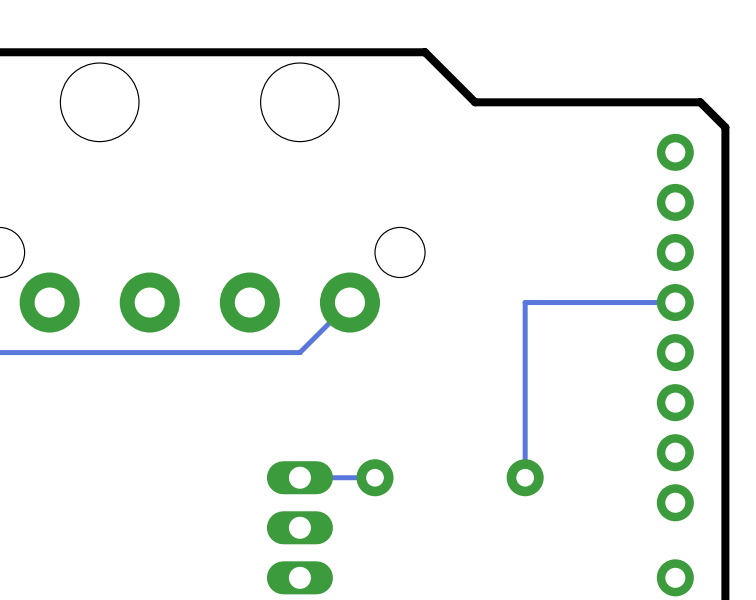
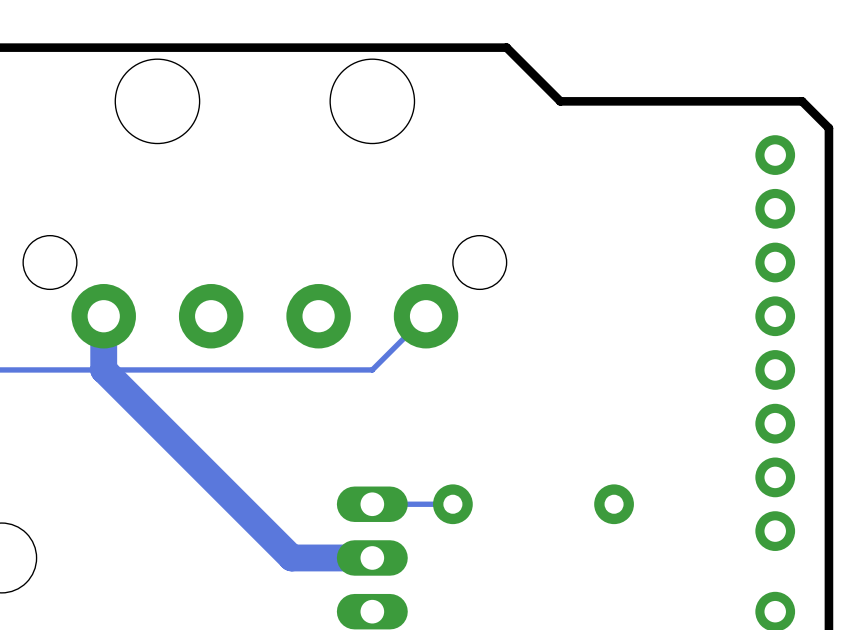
track: none -> (103, 316) (103, 369) (291, 557) (372, 557)
track: (675, 302) (525, 302) (525, 477) -> none

